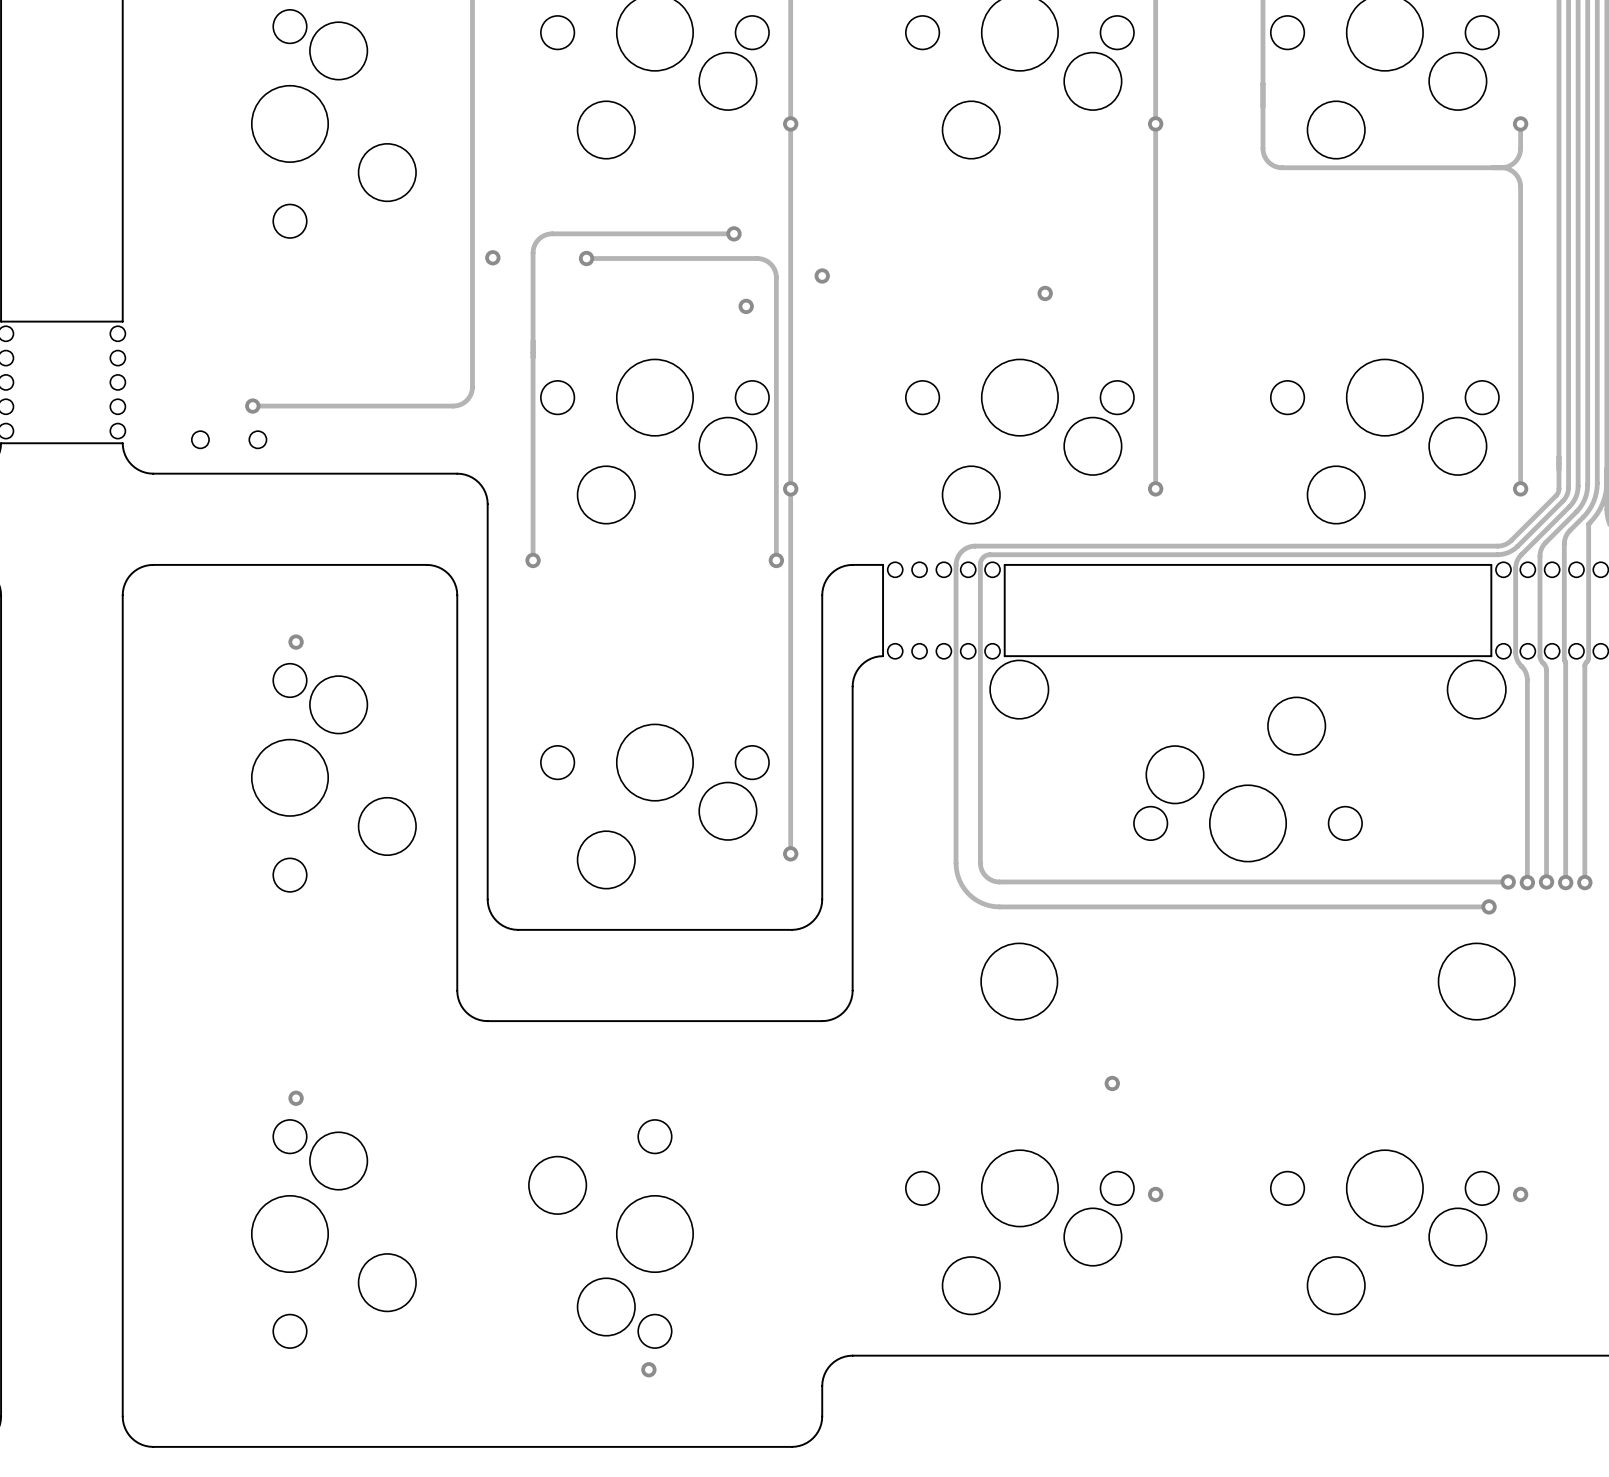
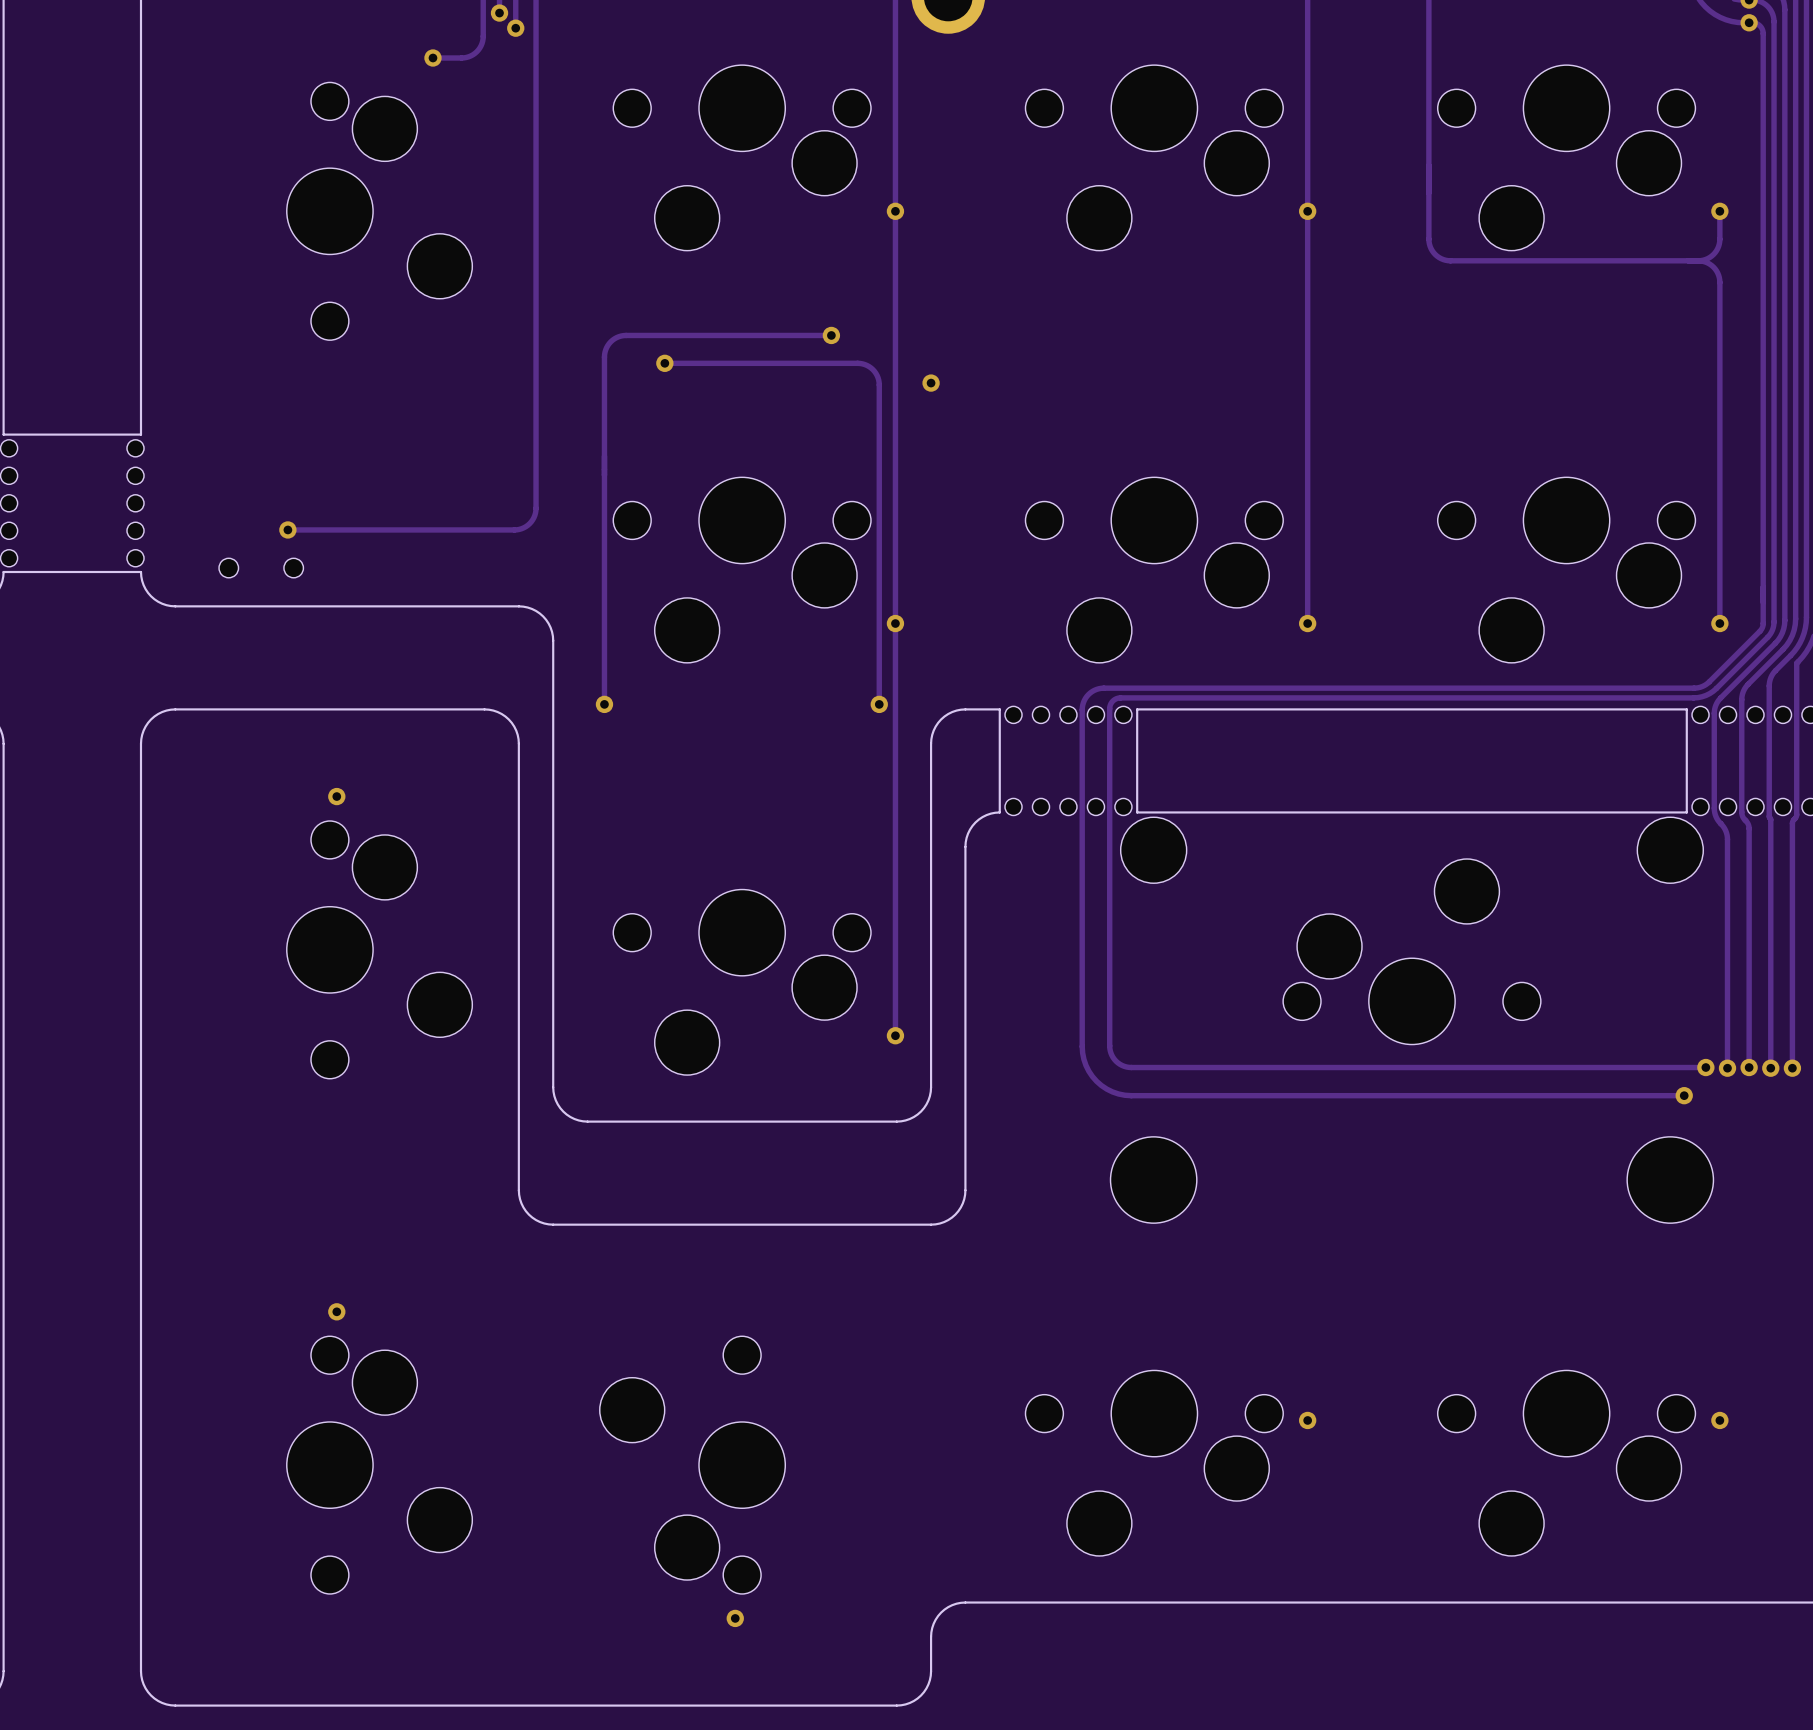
via: (492, 257) -> none
via: (1045, 293) -> none
via: (746, 306) -> none
via: (1112, 1083) -> none

